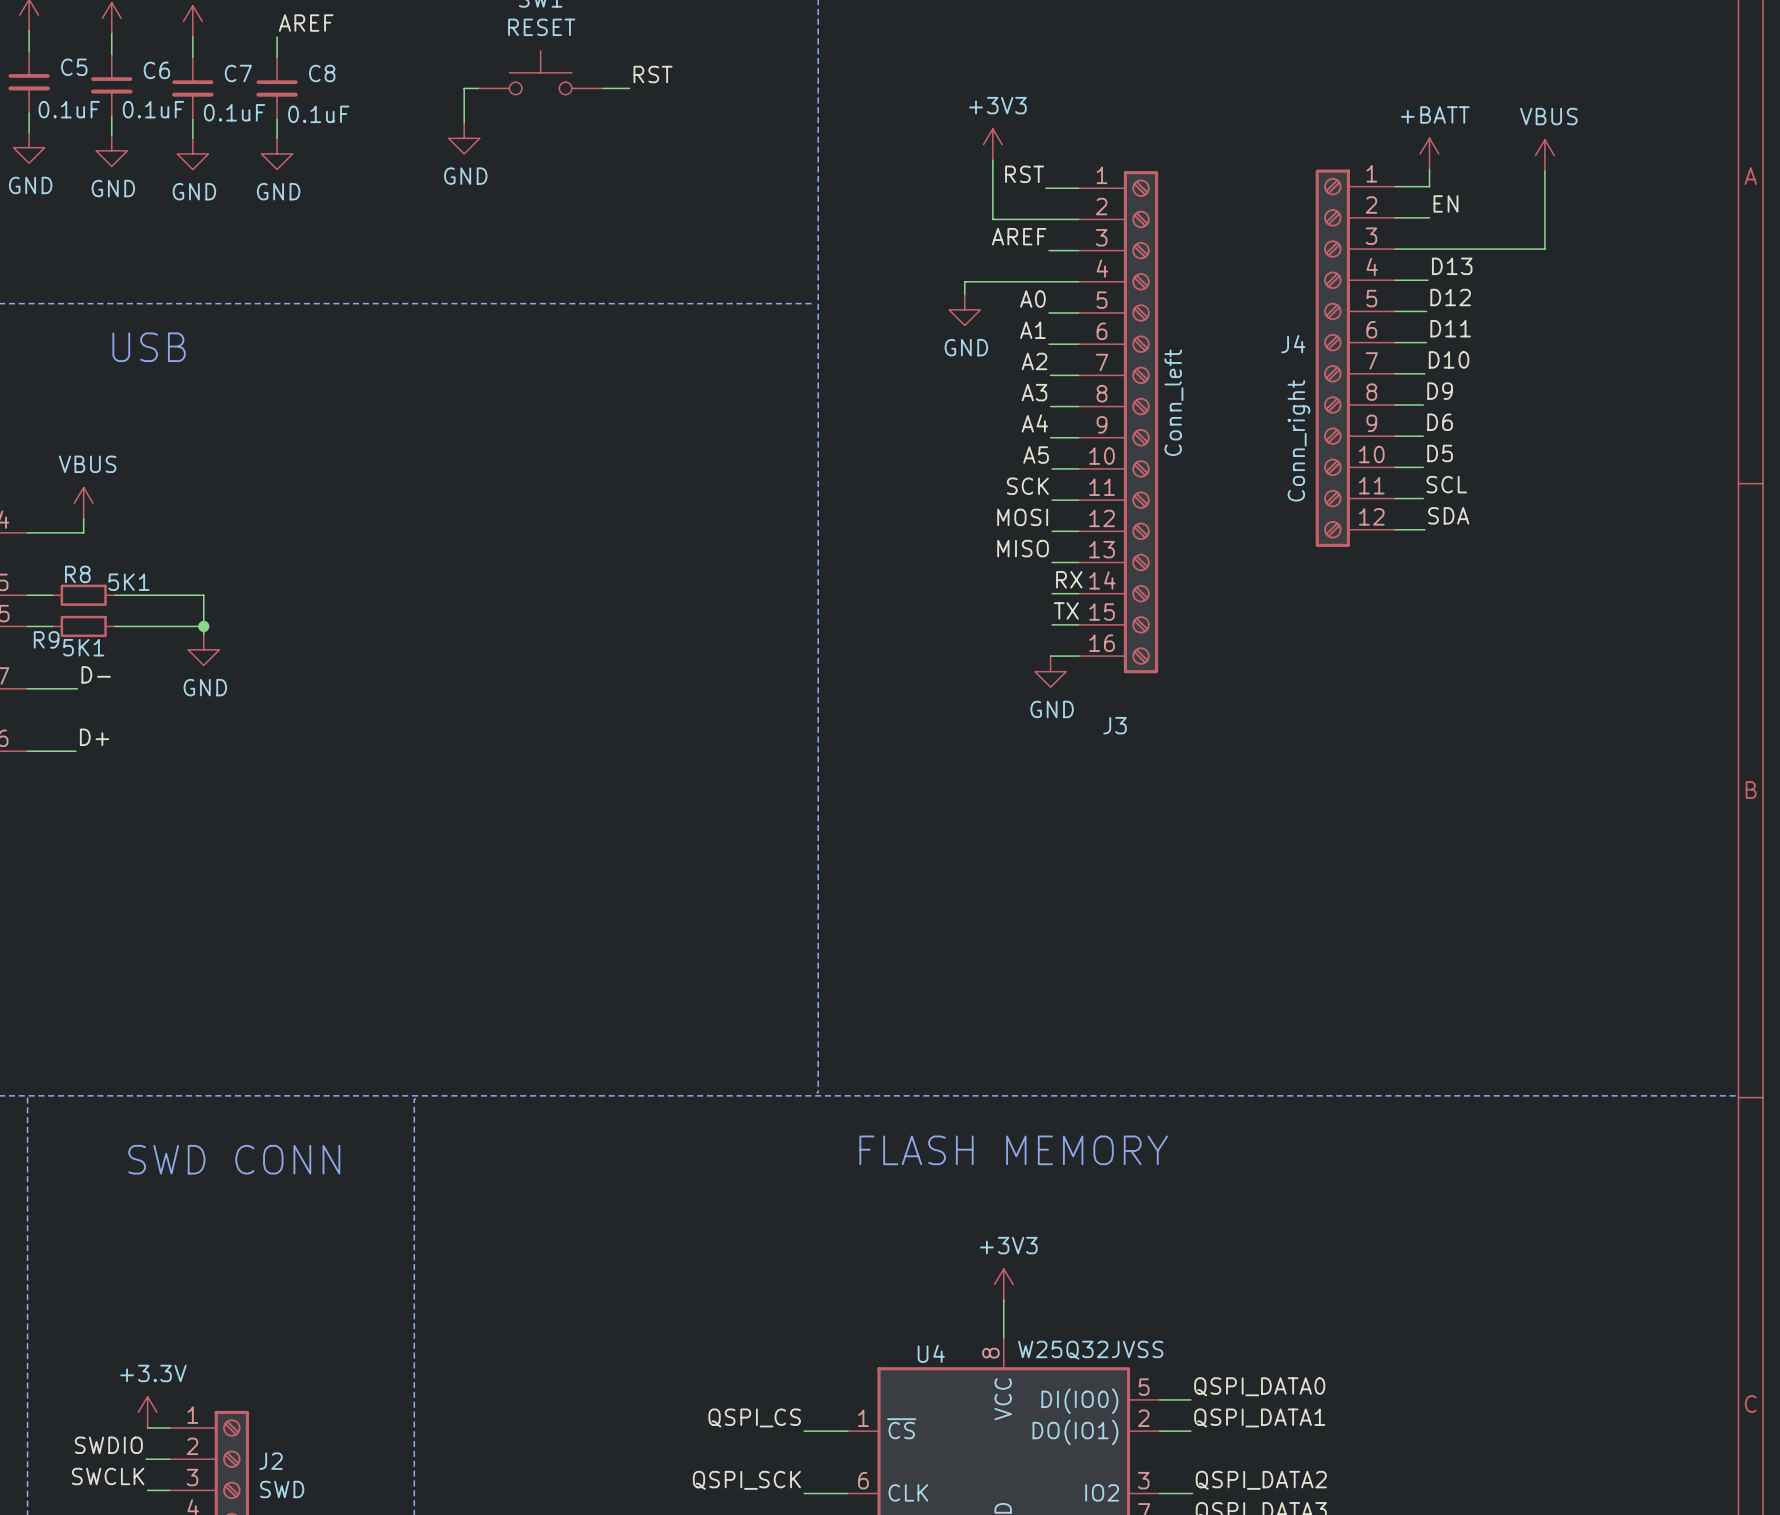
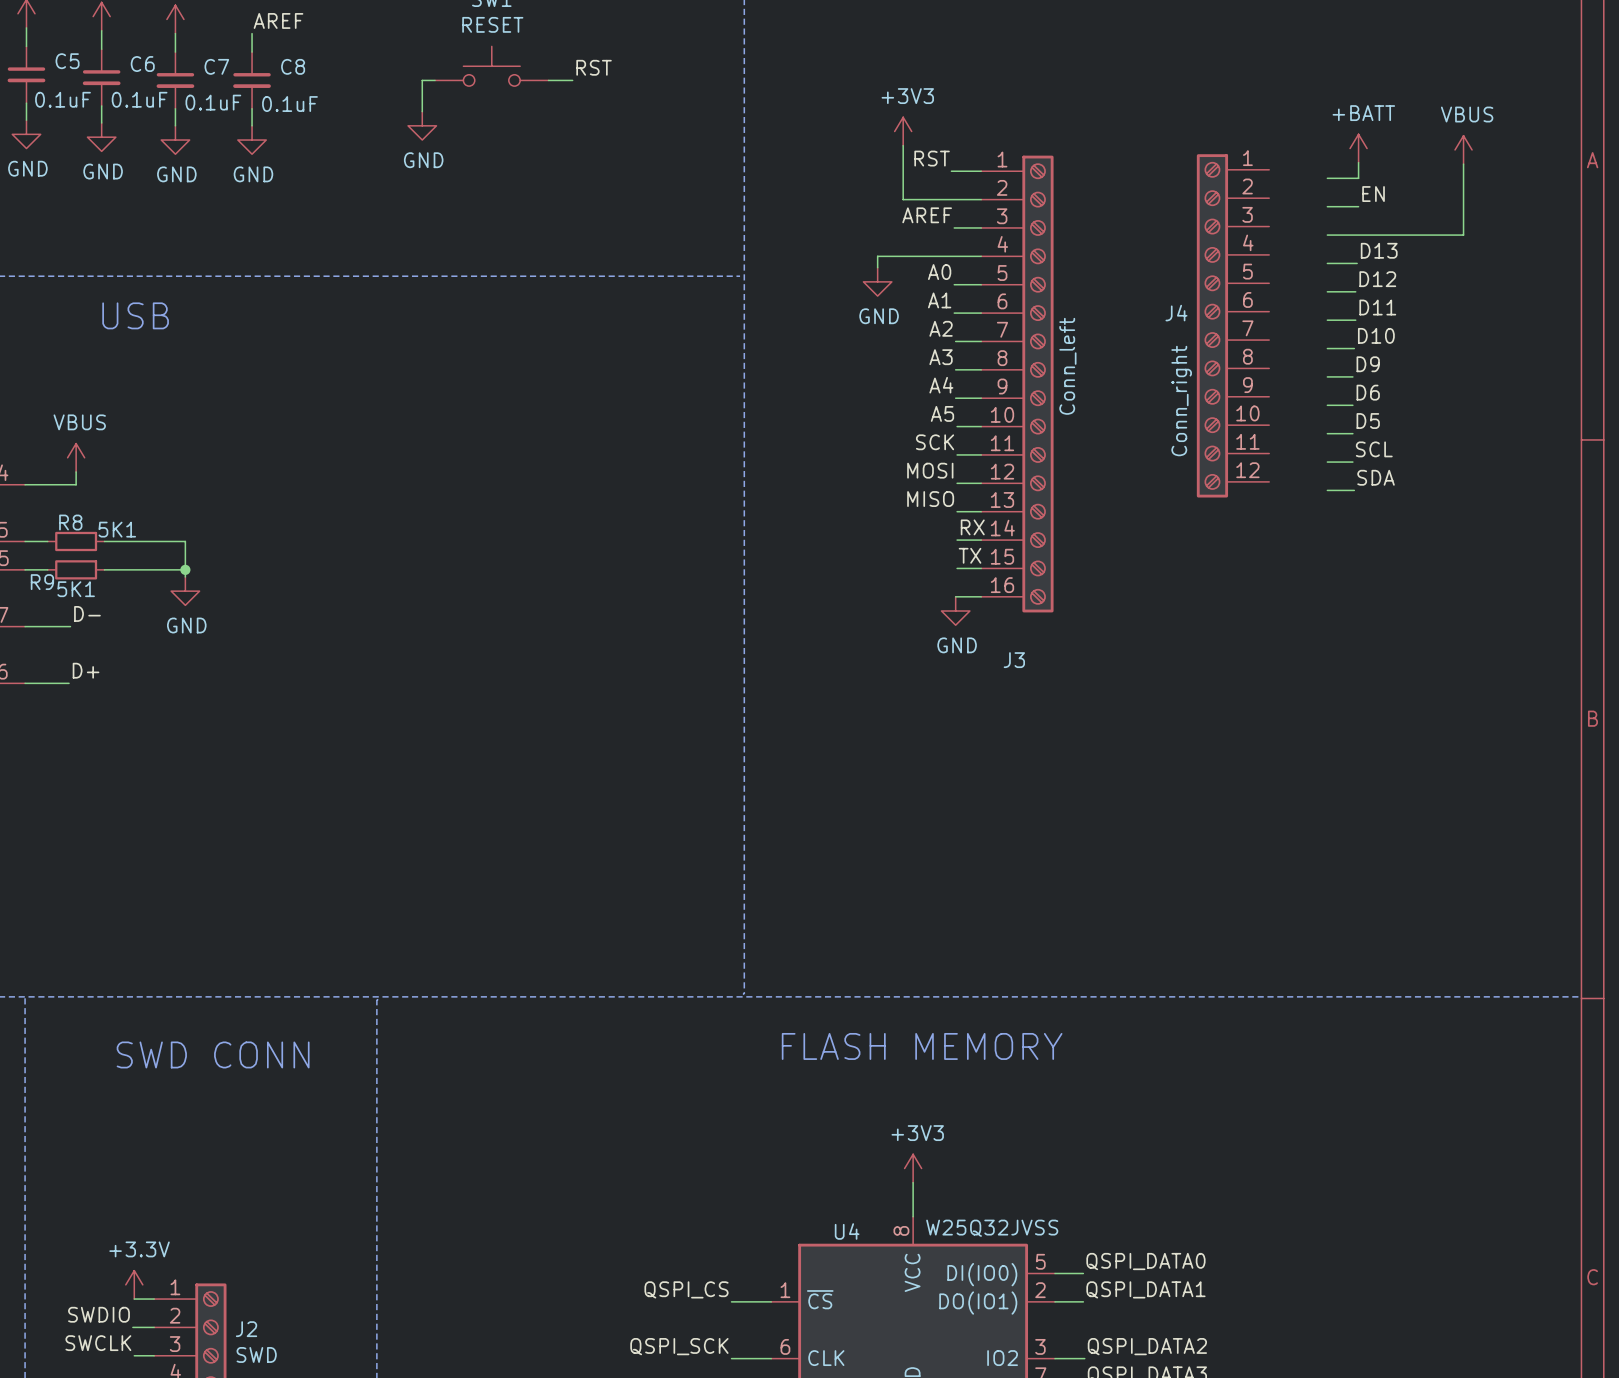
power symbol position: +BATT (1429, 153) -> +BATT (1358, 148)
power symbol position: VBUS (1544, 155) -> VBUS (1463, 149)
wire: (1429, 169) (1429, 186) (1395, 186) -> (1358, 162) (1358, 178) (1327, 178)
wire: (1544, 171) (1544, 249) (1395, 249) -> (1463, 164) (1463, 235) (1327, 235)
label position: EN (1445, 203) -> EN (1373, 194)
wire: (1395, 217) (1429, 217) -> (1327, 206) (1358, 206)
label position: D13 (1452, 266) -> D13 (1379, 250)
wire: (1395, 280) (1427, 280) -> (1327, 263) (1357, 263)
label position: D12 (1450, 297) -> D12 (1377, 279)
wire: (1395, 311) (1426, 311) -> (1327, 291) (1355, 291)
label position: D11 (1450, 328) -> D11 (1377, 307)
wire: (1395, 342) (1426, 342) -> (1327, 320) (1355, 320)
label position: D10 (1449, 359) -> D10 (1376, 335)
wire: (1395, 373) (1424, 373) -> (1327, 348) (1354, 348)
label position: D9 (1440, 391) -> D9 (1368, 364)
wire: (1395, 405) (1423, 405) -> (1327, 376) (1352, 376)
label position: D6 (1440, 422) -> D6 (1368, 392)
wire: (1395, 436) (1423, 436) -> (1327, 405) (1352, 405)
label position: D5 (1440, 453) -> D5 (1368, 421)
wire: (1395, 467) (1423, 467) -> (1327, 433) (1352, 433)
label position: SCL (1446, 484) -> SCL (1374, 449)
wire: (1395, 498) (1423, 498) -> (1327, 462) (1352, 462)
label position: SDA (1448, 515) -> SDA (1376, 477)
wire: (1395, 529) (1424, 529) -> (1327, 490) (1354, 490)

